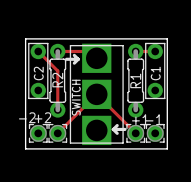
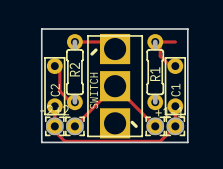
track: (38, 51) (57, 70) (57, 109) -> none
line: (74, 55) (78, 59) (66, 59) -> none
track: none -> (155, 46) (160, 46) (160, 56) (170, 66) (175, 66)
C2 position: (38, 70) -> (54, 86)
C1 position: (155, 70) -> (175, 86)
track: none -> (54, 66) (59, 66) (59, 91) (74, 106)
track: none -> (54, 106) (54, 131) (64, 141) (160, 141) (175, 126) (175, 106)
line: (117, 125) (113, 129) (125, 129) -> none

